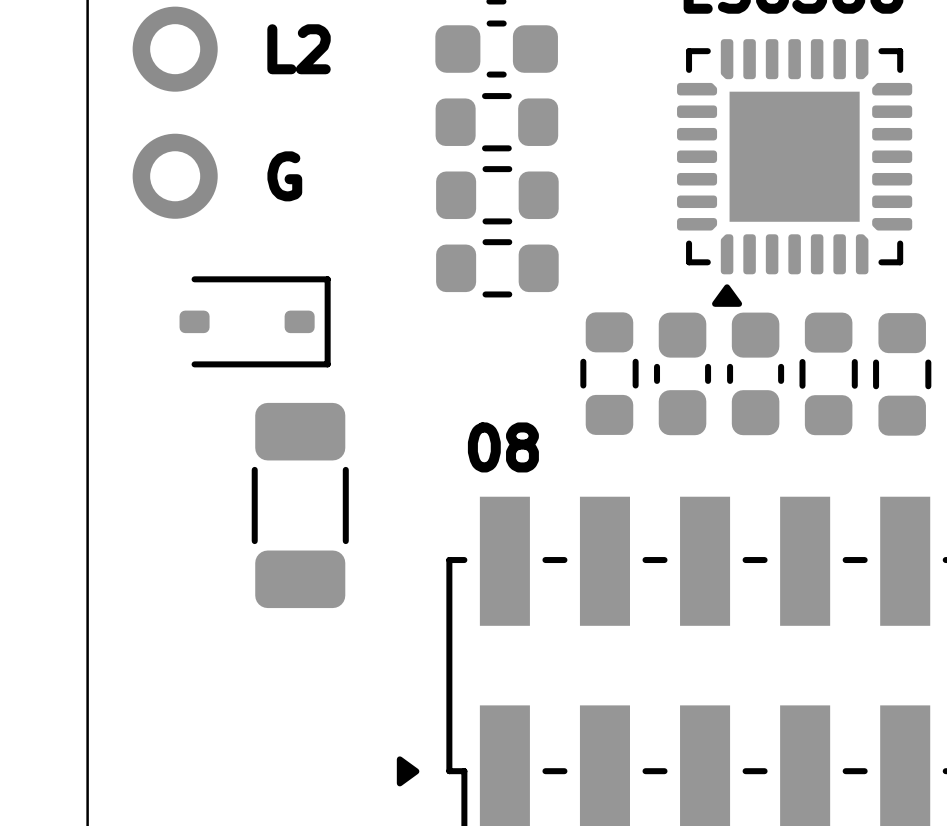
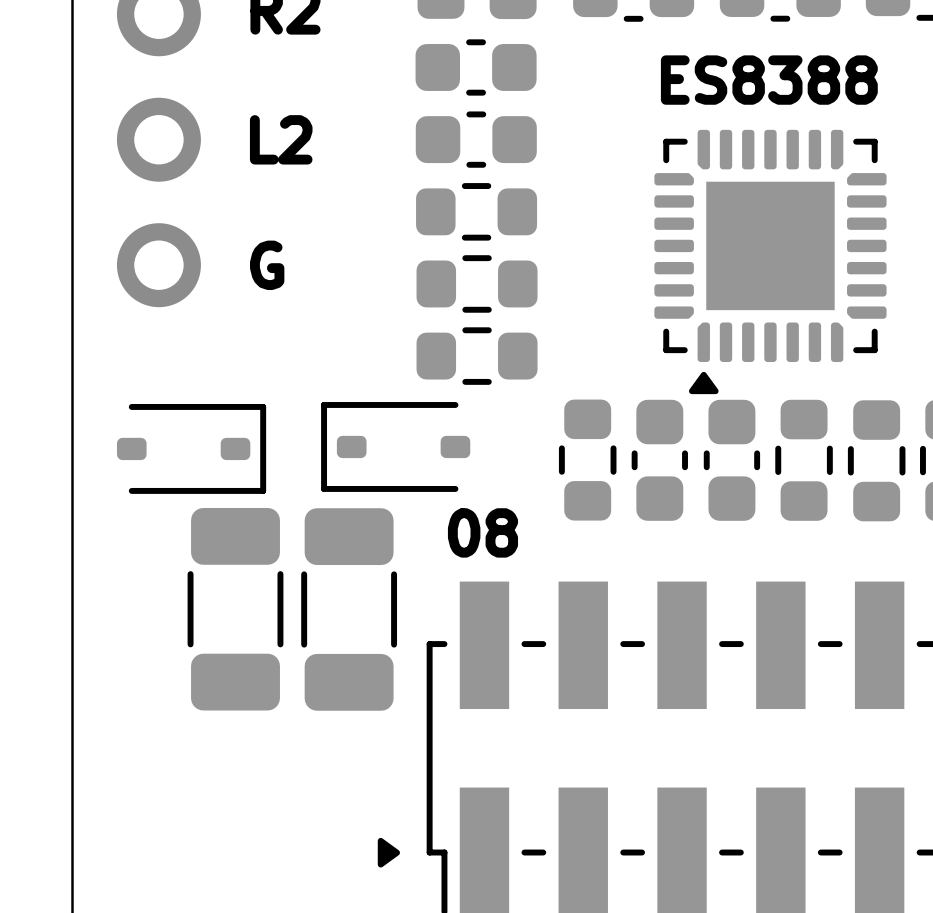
part position: (255, 321) -> (191, 448)
part: none -> (395, 446)
part: (300, 505) -> none
part: none -> (235, 609)
part: none -> (349, 609)

